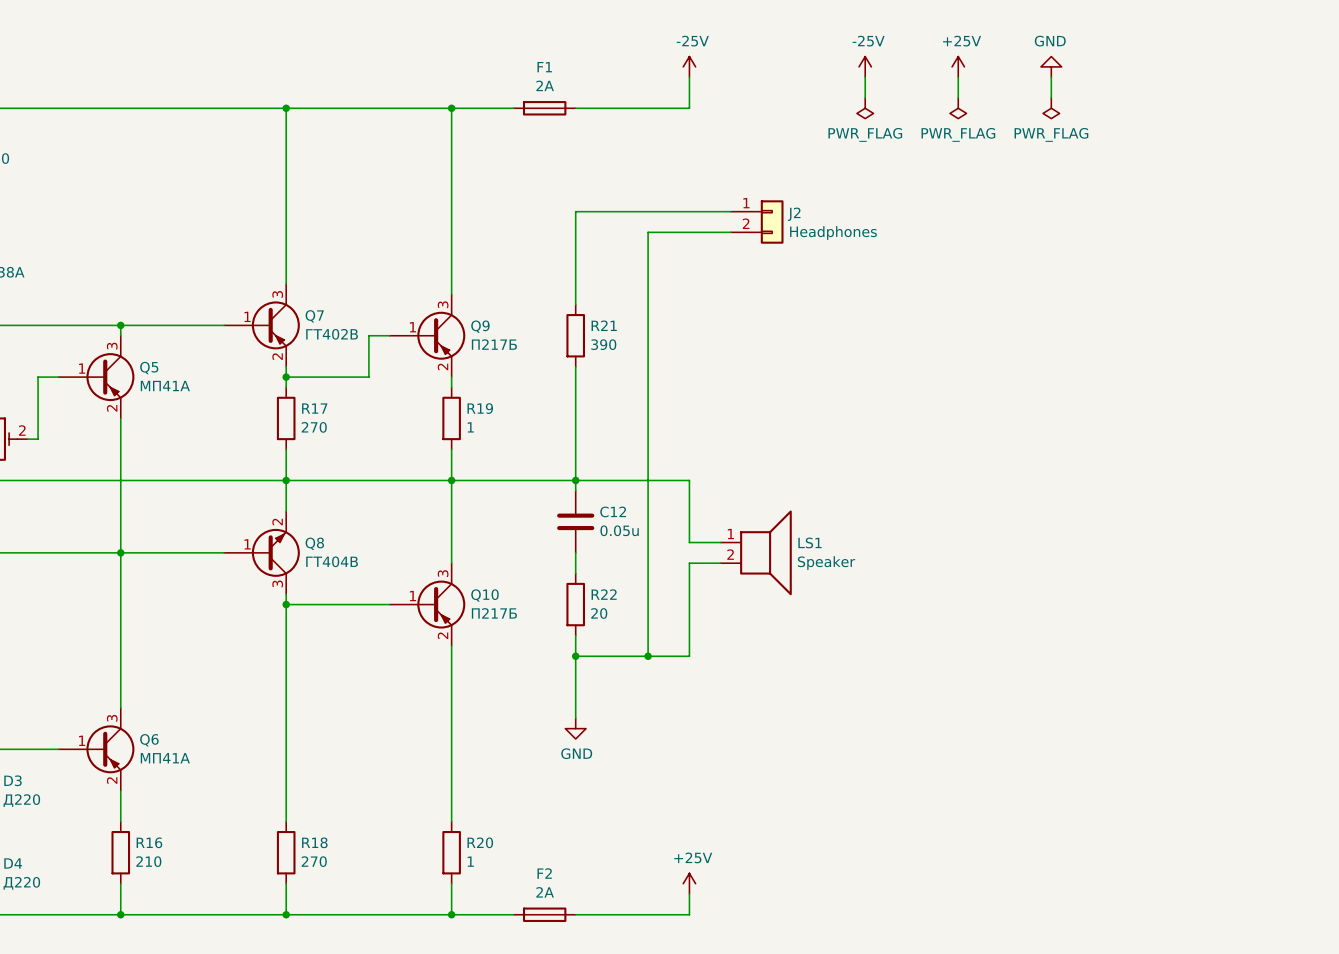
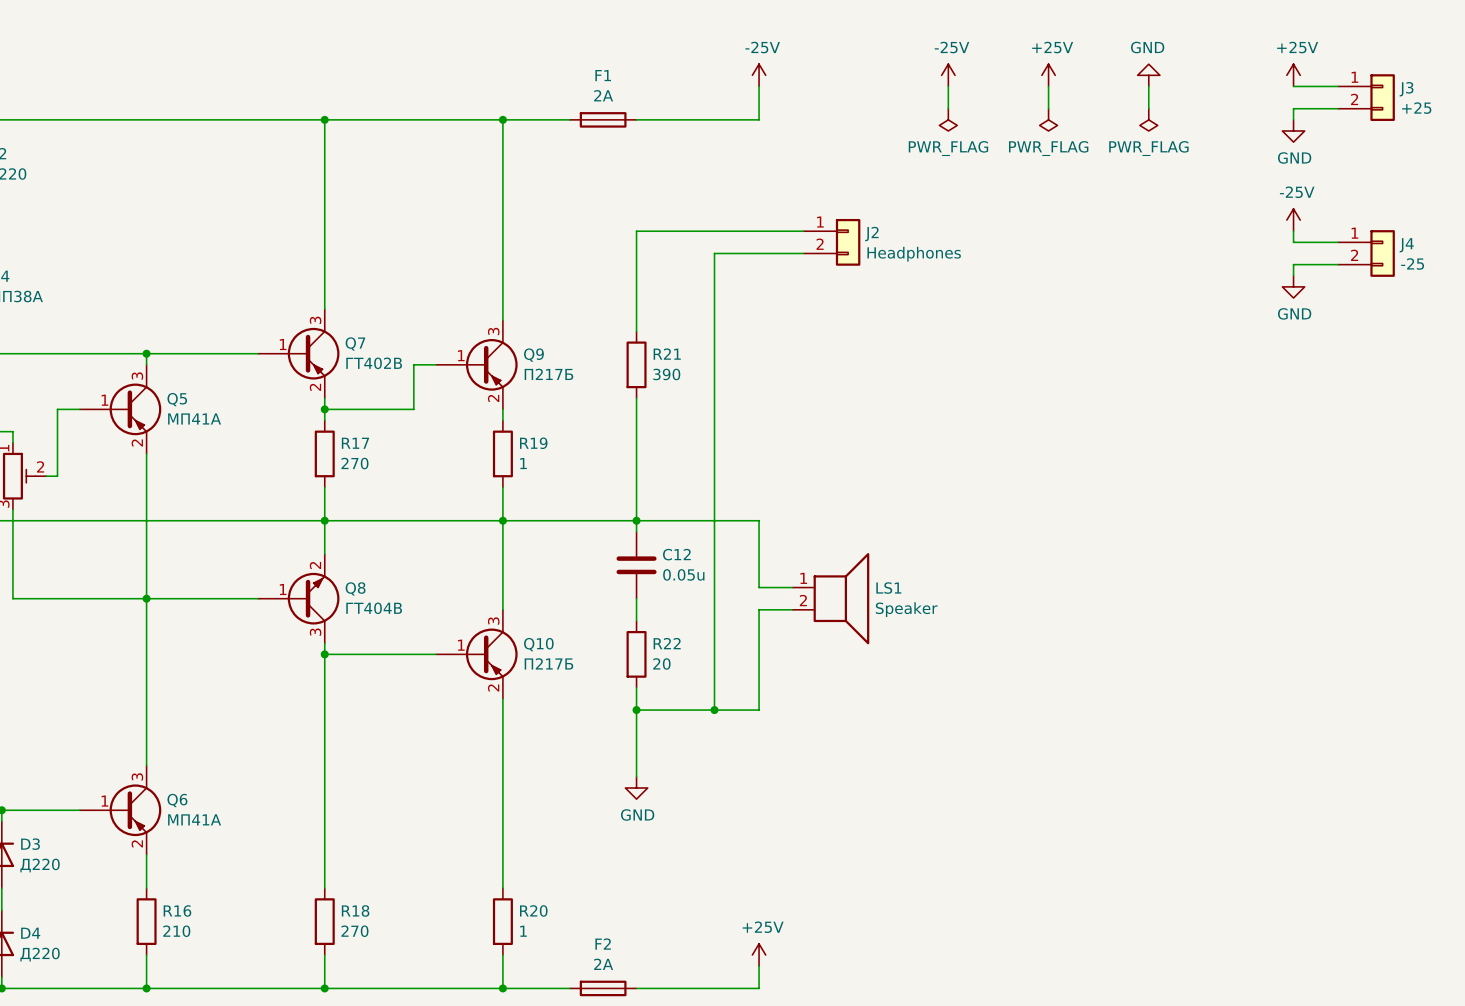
power symbol: none -> +25V (1293, 75)
wire: none -> (1293, 86) (1338, 86)
J3: none -> +25 (1366, 97)
wire: none -> (1338, 108) (1293, 108) (1293, 119)
power symbol: none -> GND (1293, 131)
power symbol: none -> -25V (1293, 220)
wire: none -> (1293, 231) (1293, 242) (1338, 242)
J4: none -> -25 (1366, 253)
wire: none -> (1338, 264) (1293, 264) (1293, 275)
power symbol: none -> GND (1293, 286)

